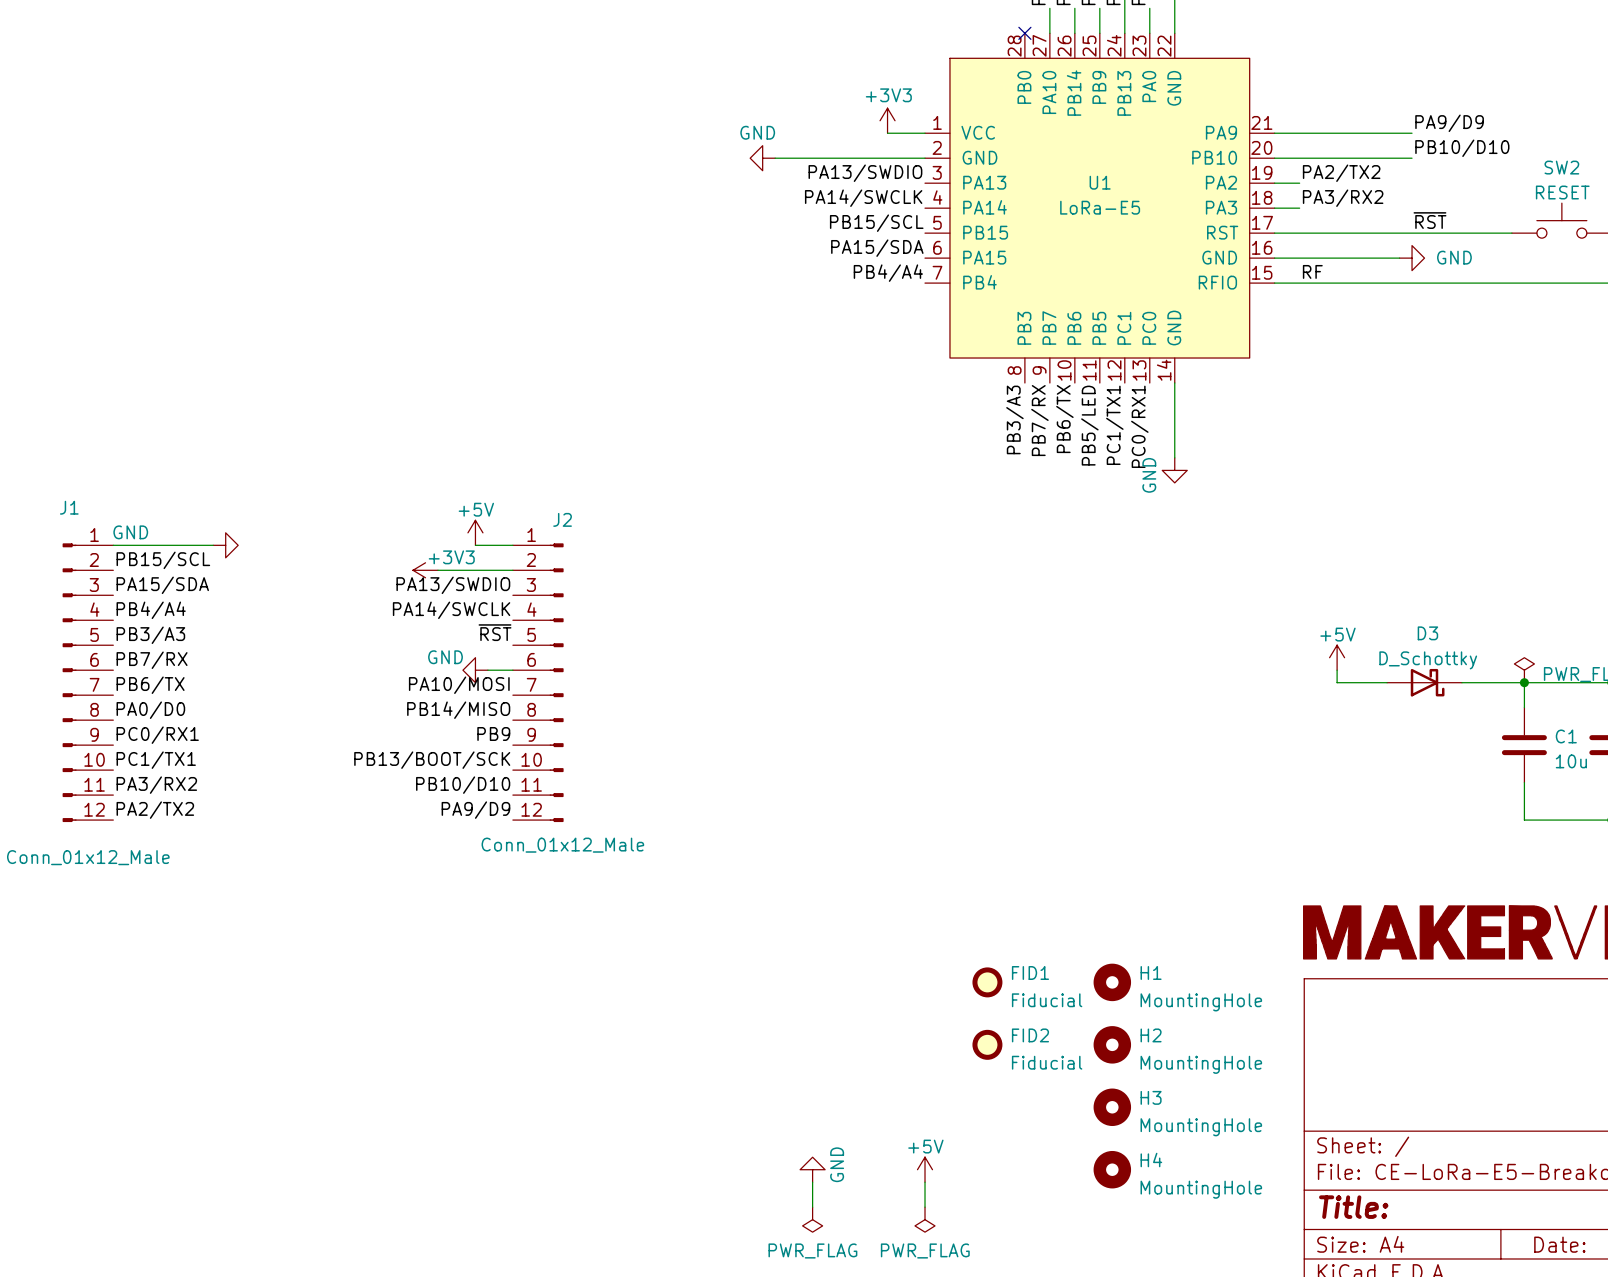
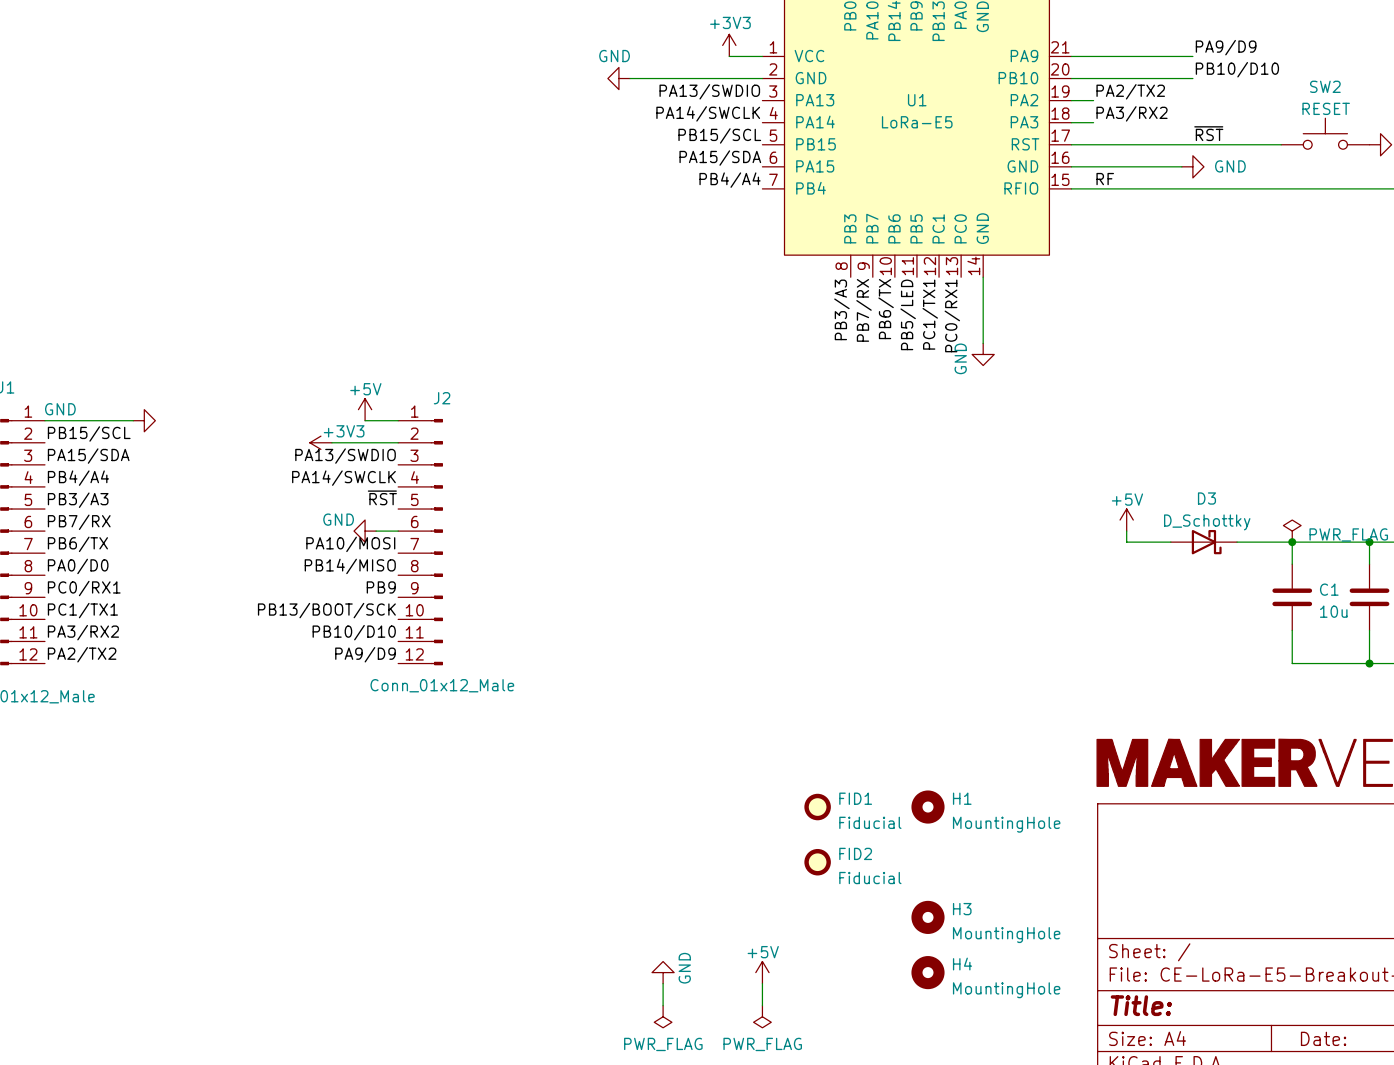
H2: MountingHole (1112, 1044) -> none

